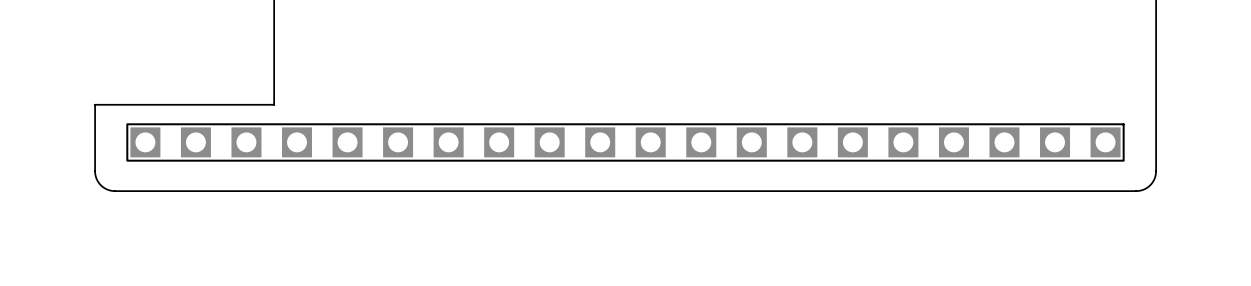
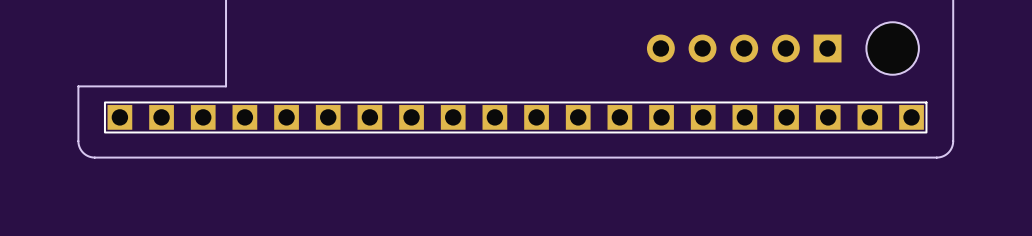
part: none -> (782, 48)

